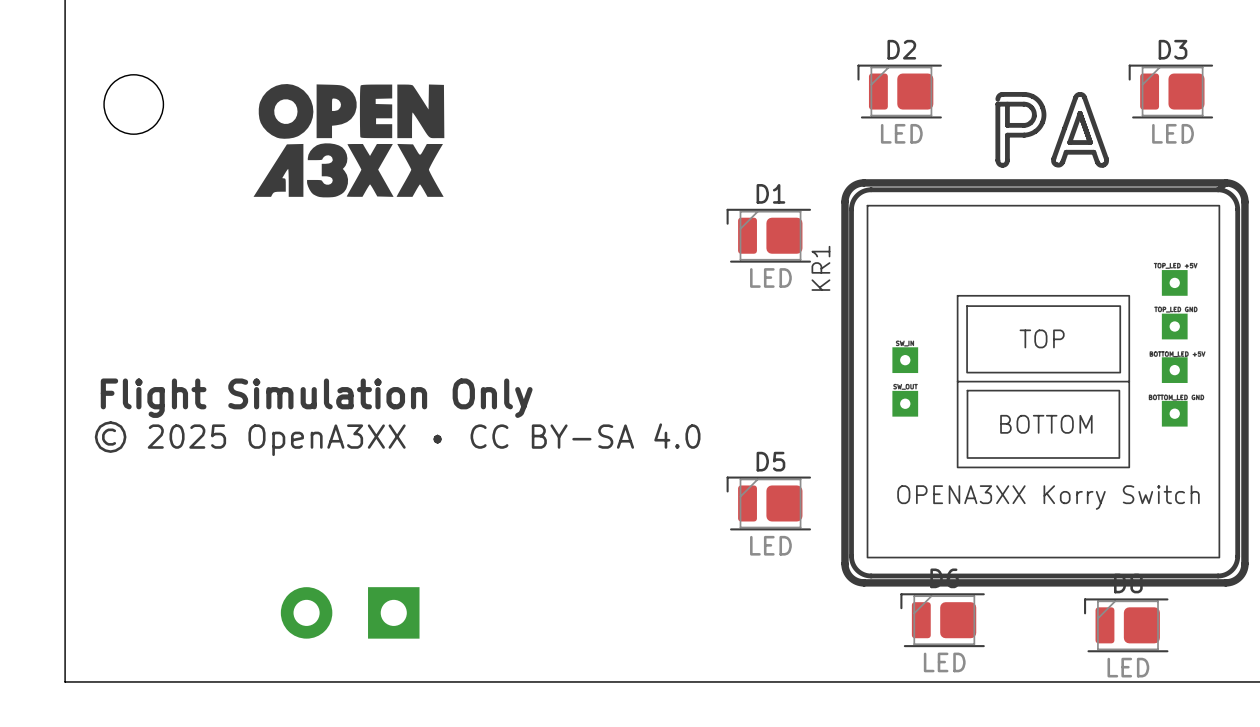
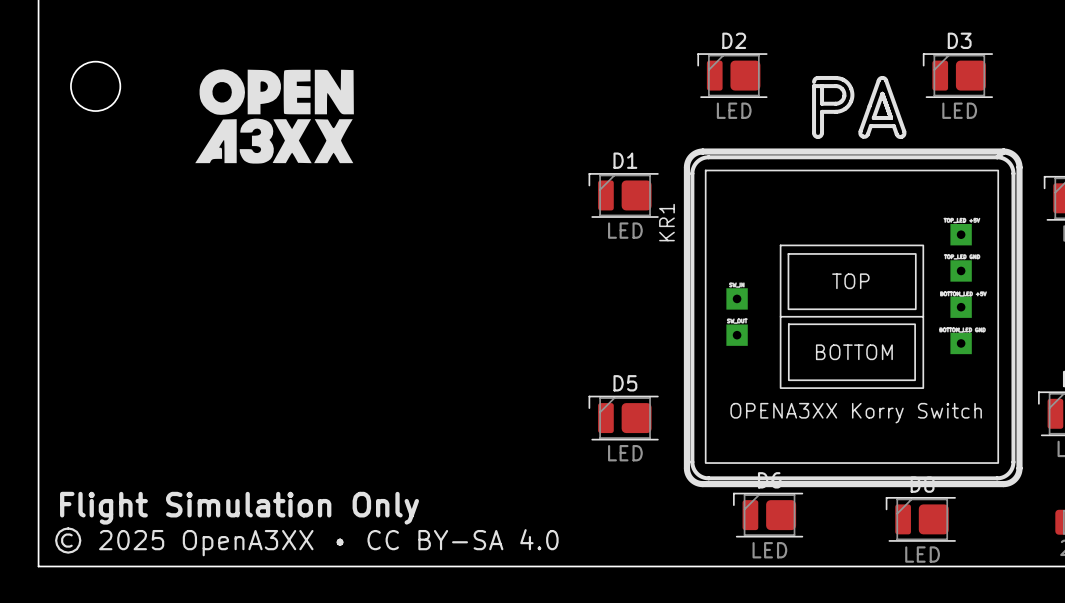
text position: Flight Simulation Only (316, 398) -> Flight Simulation Only (239, 508)
text position: © 2025 OpenA3XX • CC BY-SA 4.0 (397, 438) -> © 2025 OpenA3XX • CC BY-SA 4.0 (306, 541)
part: (350, 612) -> none

